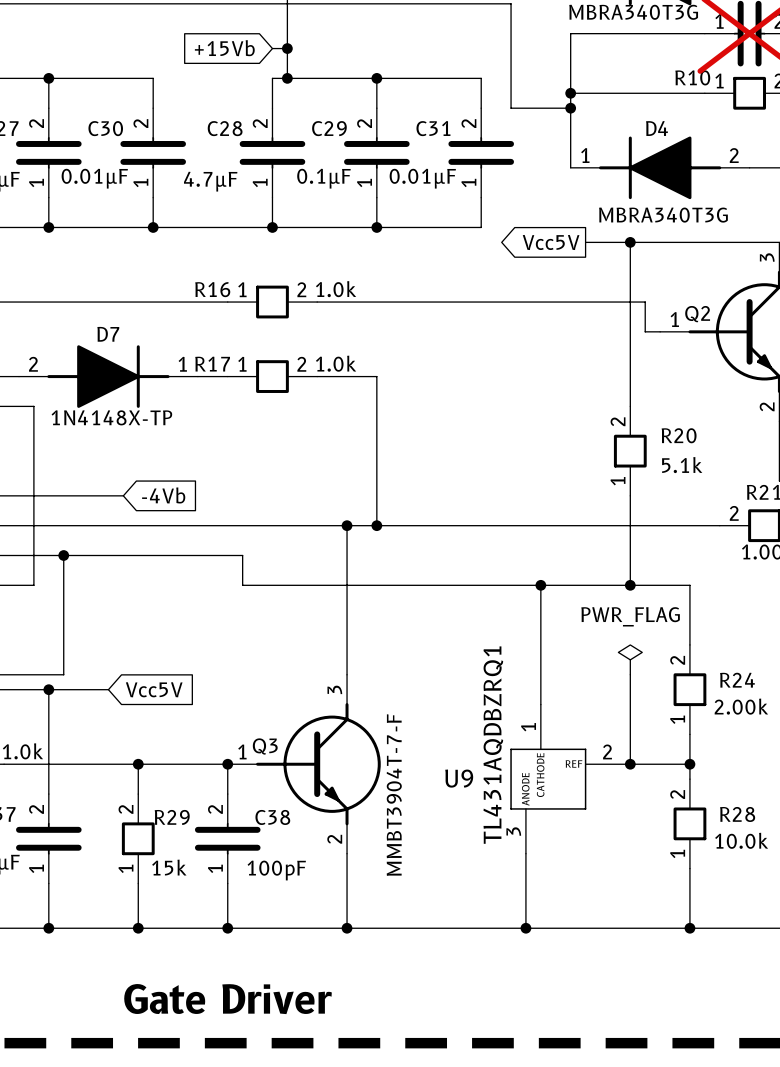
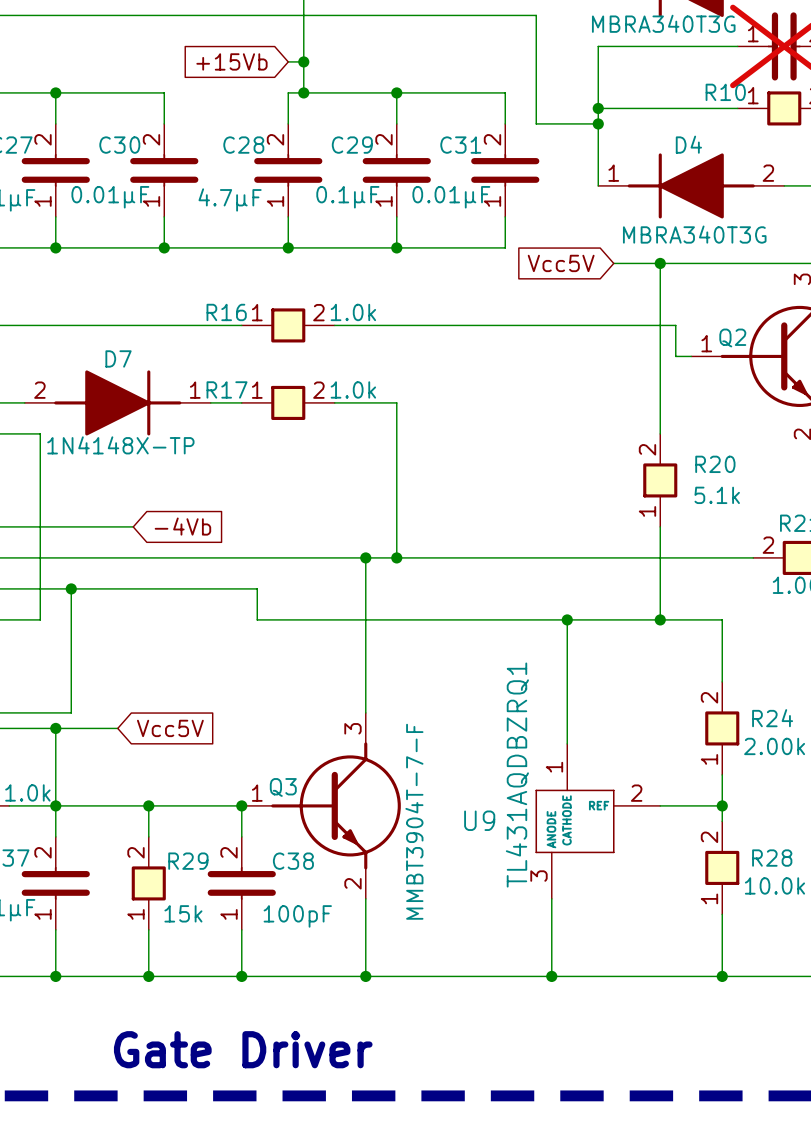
global label shape: output (551, 242) -> input (561, 263)
power symbol: PWR_FLAG (630, 659) -> none
wire: (630, 674) (630, 764) -> none
junction: none -> (55, 805)
junction: (630, 764) -> none

